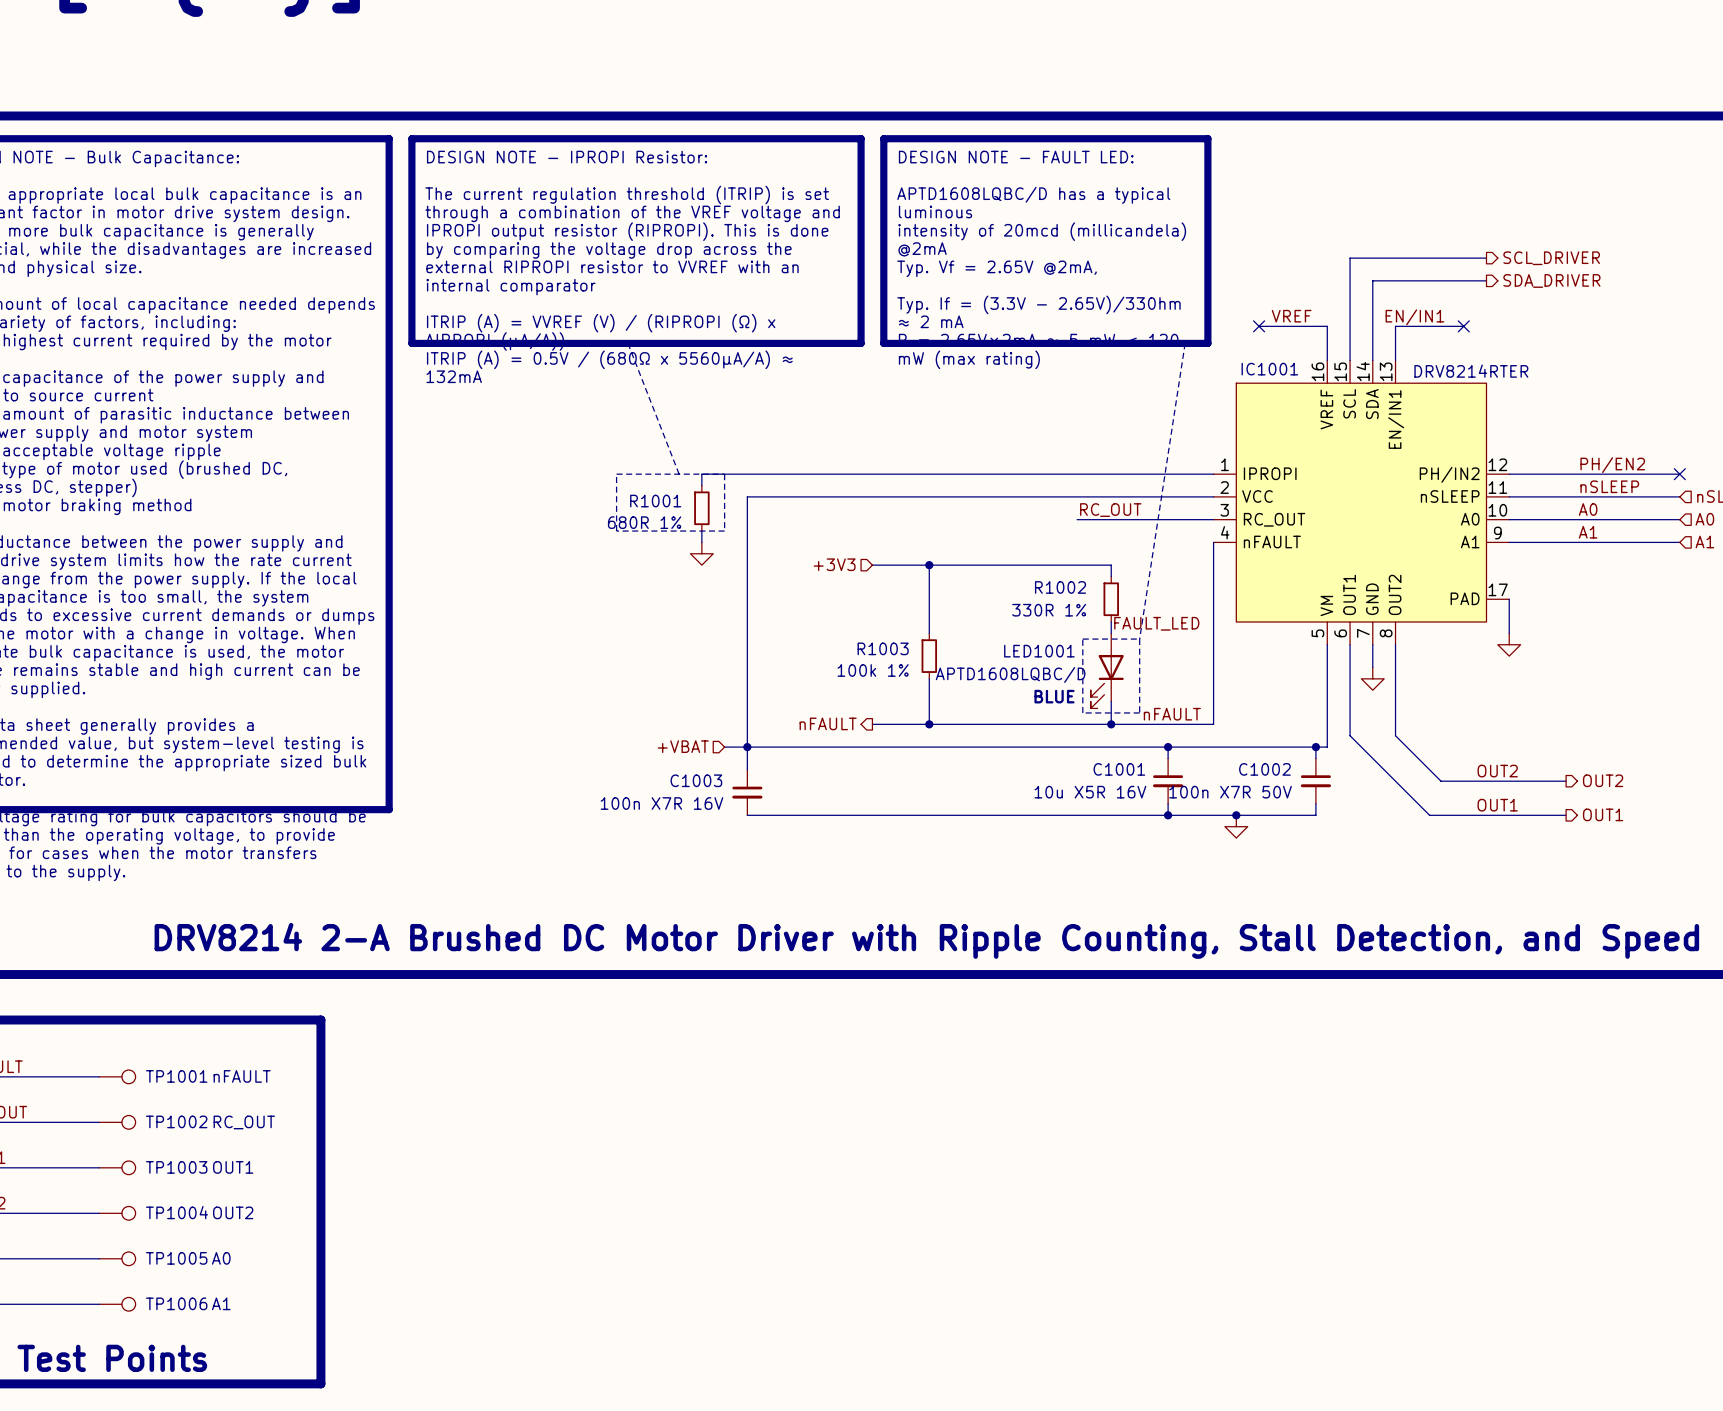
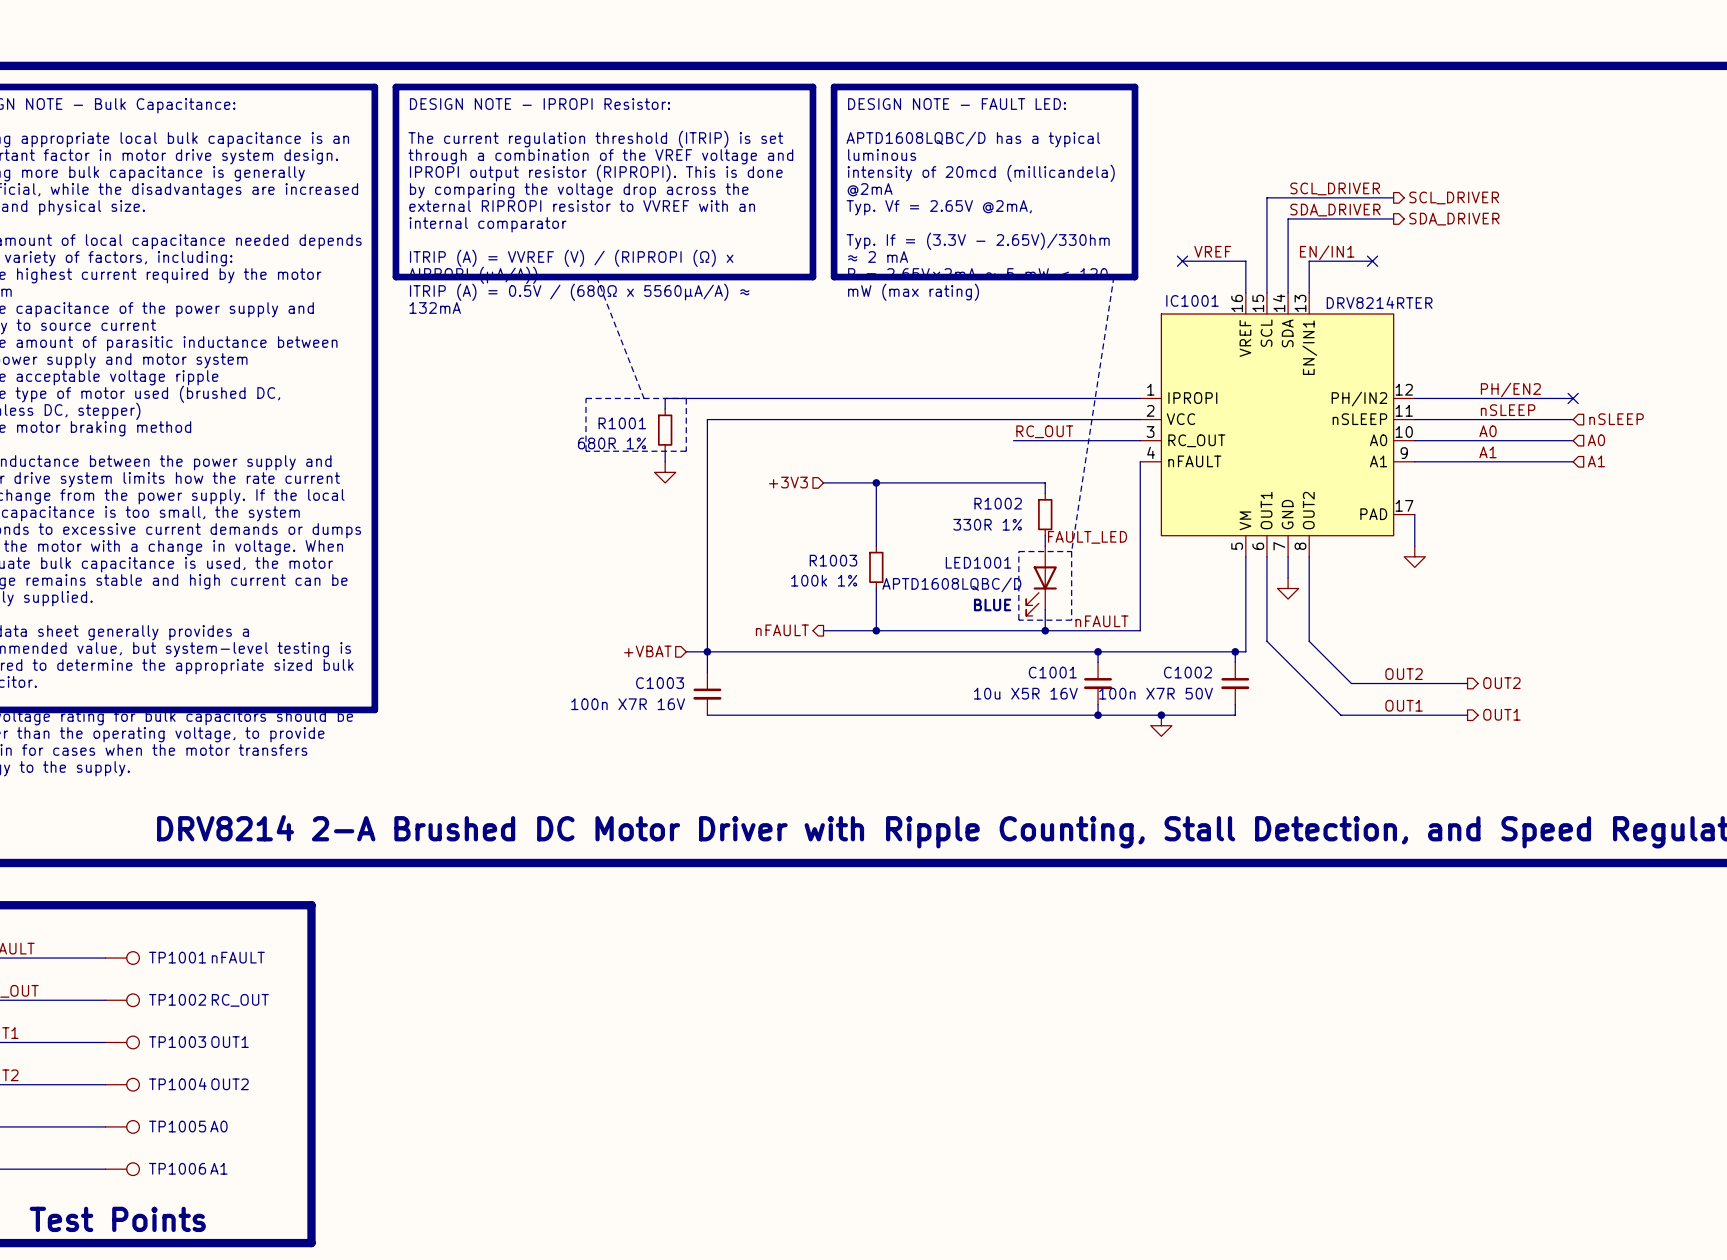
label: none -> SCL_DRIVER (1335, 188)
label: none -> SDA_DRIVER (1335, 210)

